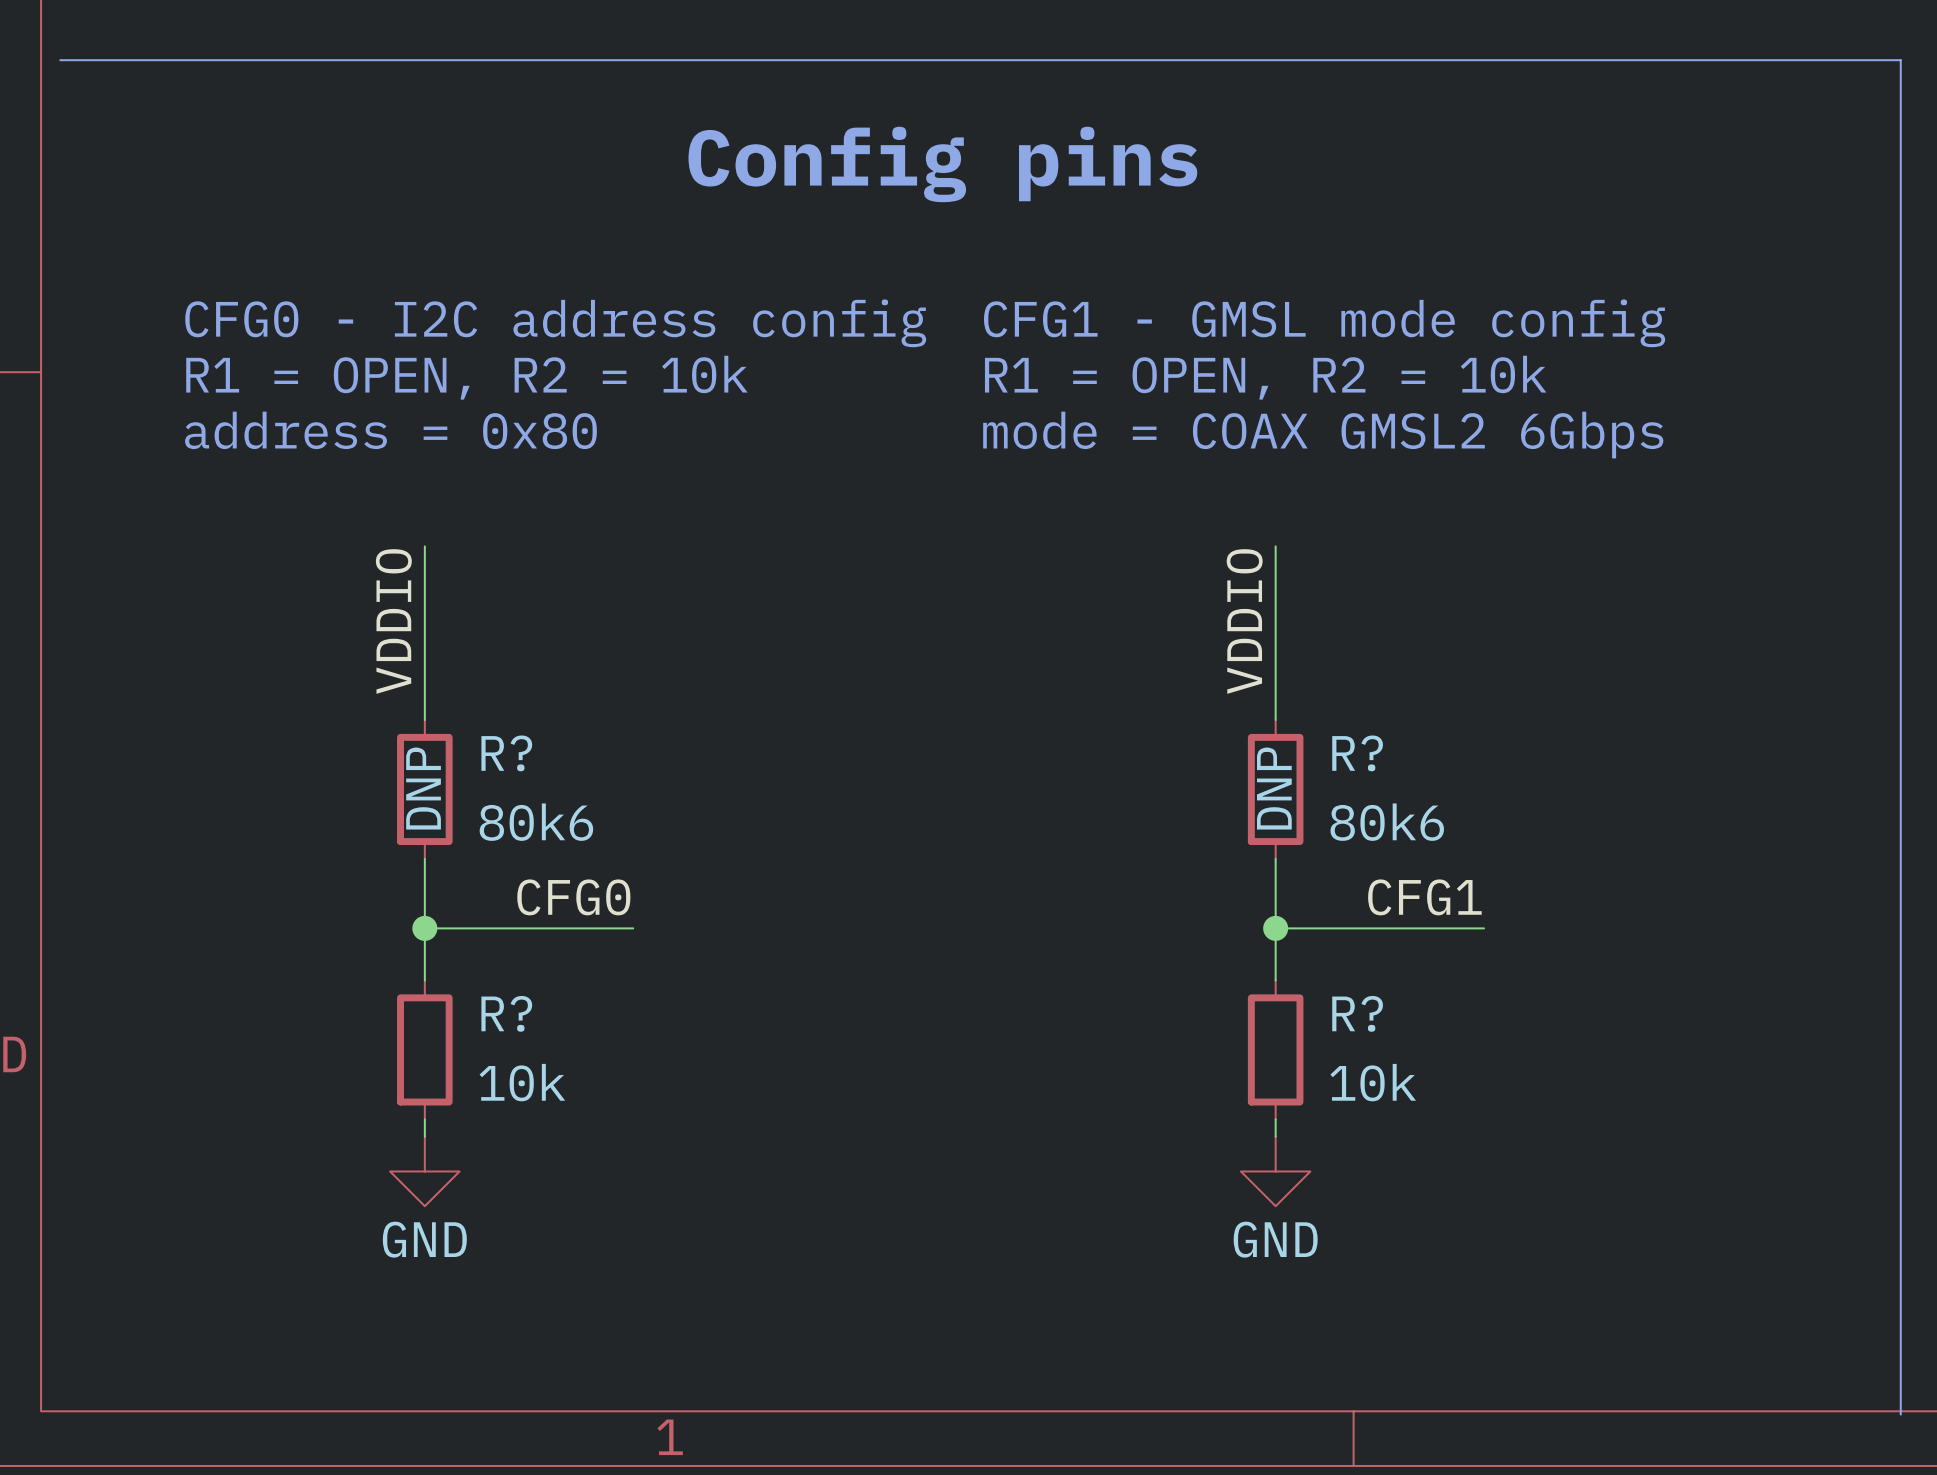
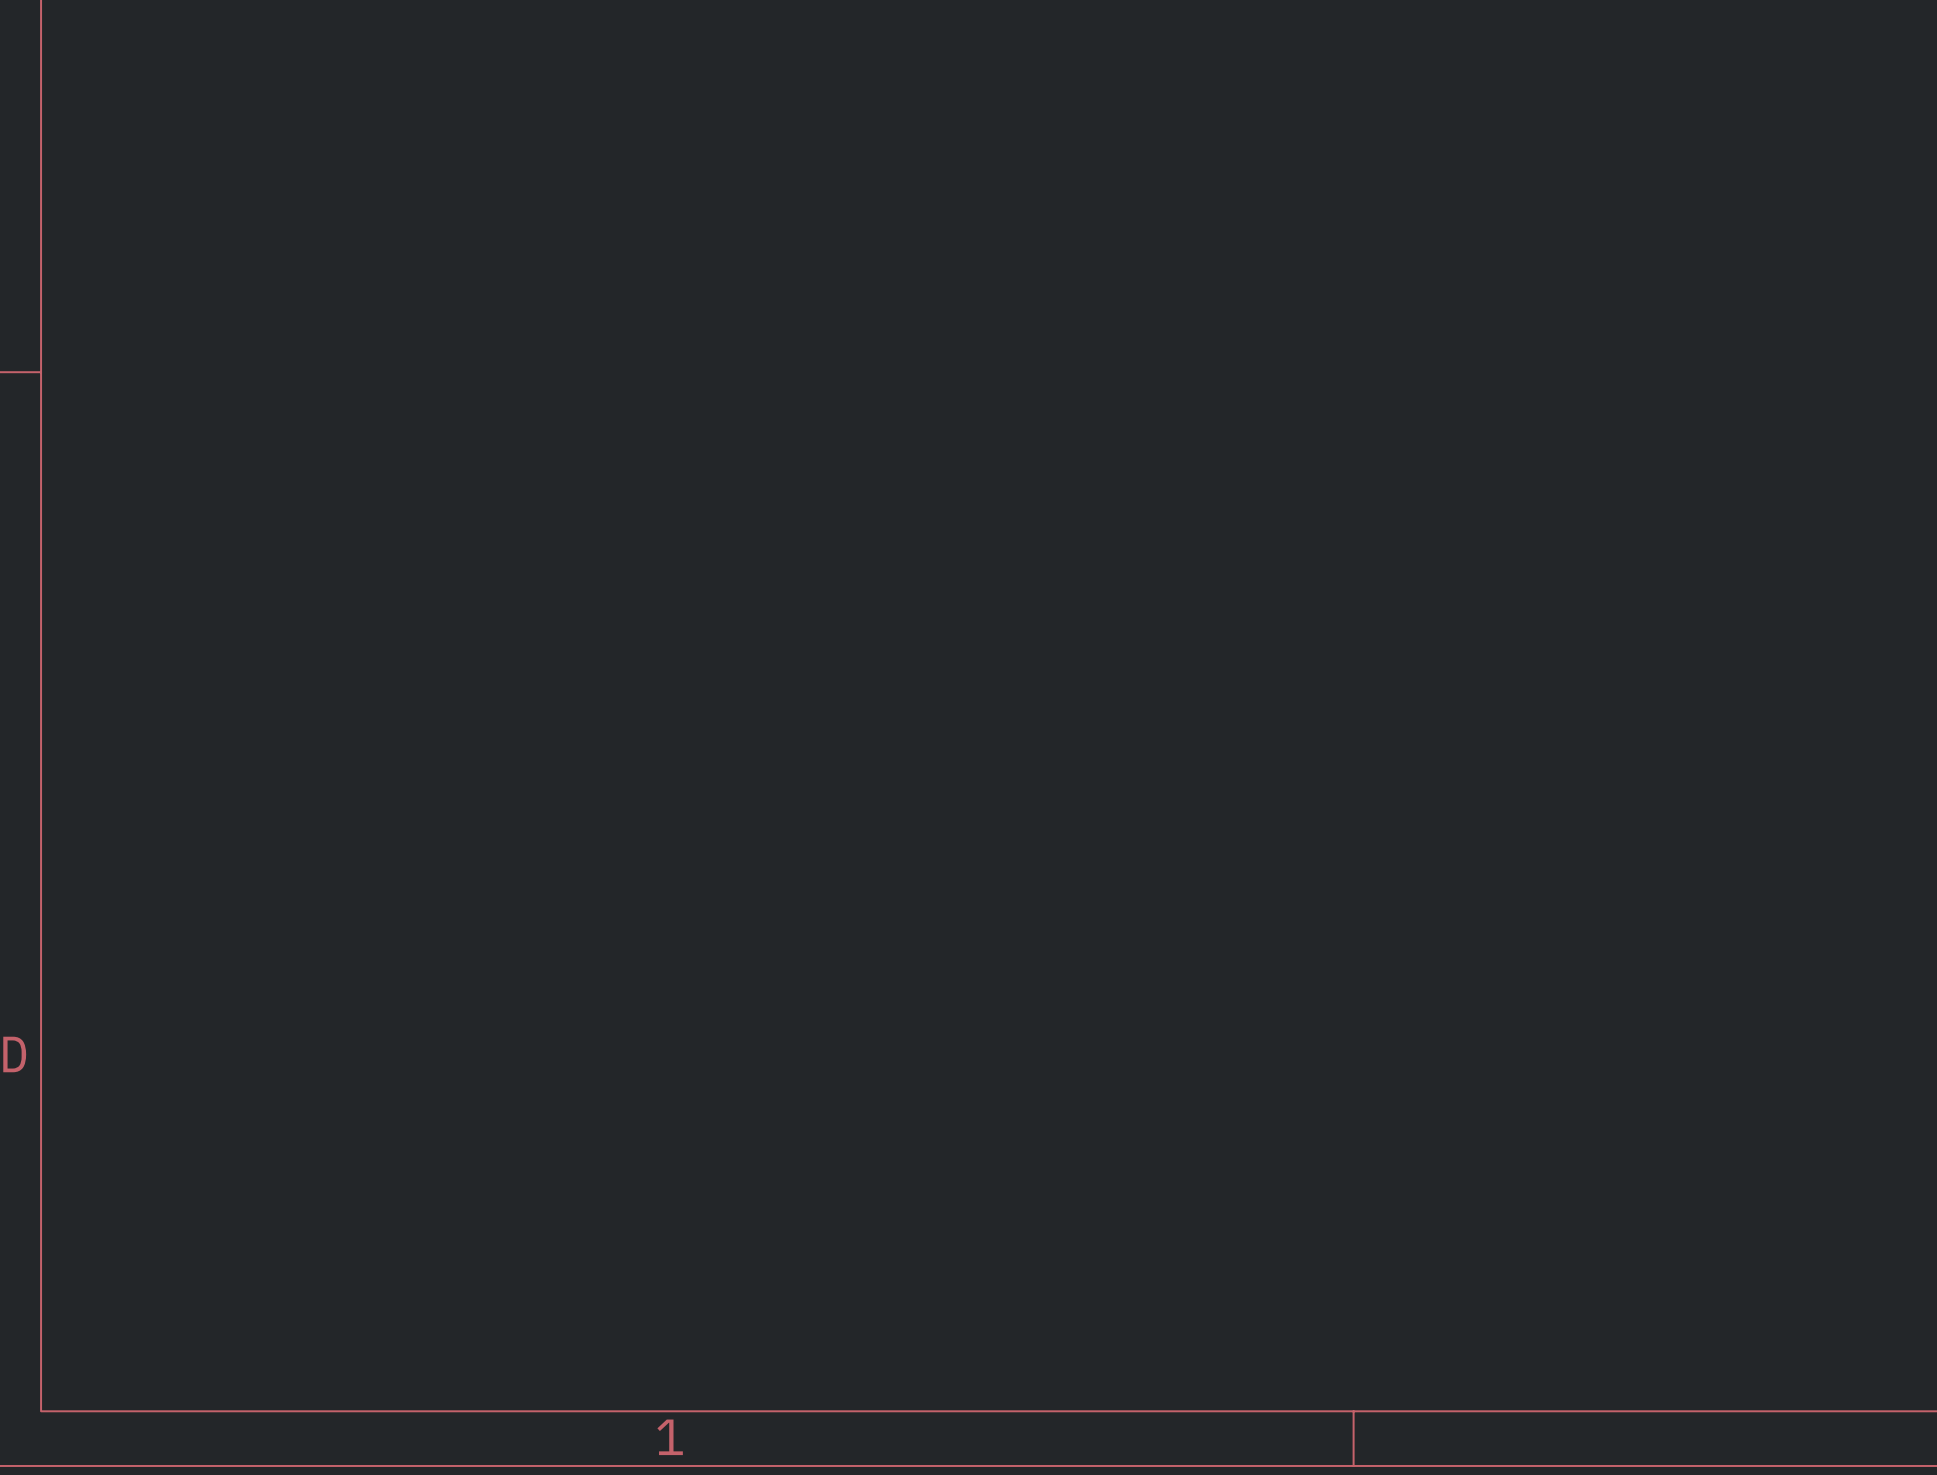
line: (60, 60) (1900, 60) (1900, 1414) -> none
text: Config pins (942, 164) -> none
text: CFG0 - I2C address config (555, 323) -> none
text: CFG1 - GMSL mode config (1324, 323) -> none
text: R1 = OPEN, R2 = 10k (466, 377) -> none
text: R1 = OPEN, R2 = 10k (1265, 377) -> none
text: address = 0x80 (390, 430) -> none
text: mode = COAX GMSL2 6Gbps (1323, 435) -> none
wire: (424, 546) (424, 720) -> none
wire: (1275, 546) (1275, 720) -> none
label: VDDIO (393, 621) -> none
label: VDDIO (1244, 621) -> none
R?: (424, 789) -> none
R?: (1275, 789) -> none
wire: (424, 858) (424, 980) -> none
wire: (1275, 858) (1275, 980) -> none
label: CFG0 (573, 897) -> none
label: CFG1 (1424, 897) -> none
wire: (424, 928) (633, 928) -> none
junction: (424, 928) -> none
wire: (1275, 928) (1484, 928) -> none
junction: (1275, 928) -> none
R?: (424, 1049) -> none
R?: (1275, 1049) -> none
wire: (424, 1119) (424, 1136) -> none
wire: (1275, 1119) (1275, 1136) -> none
power symbol: GND (424, 1171) -> none
power symbol: GND (1275, 1171) -> none

